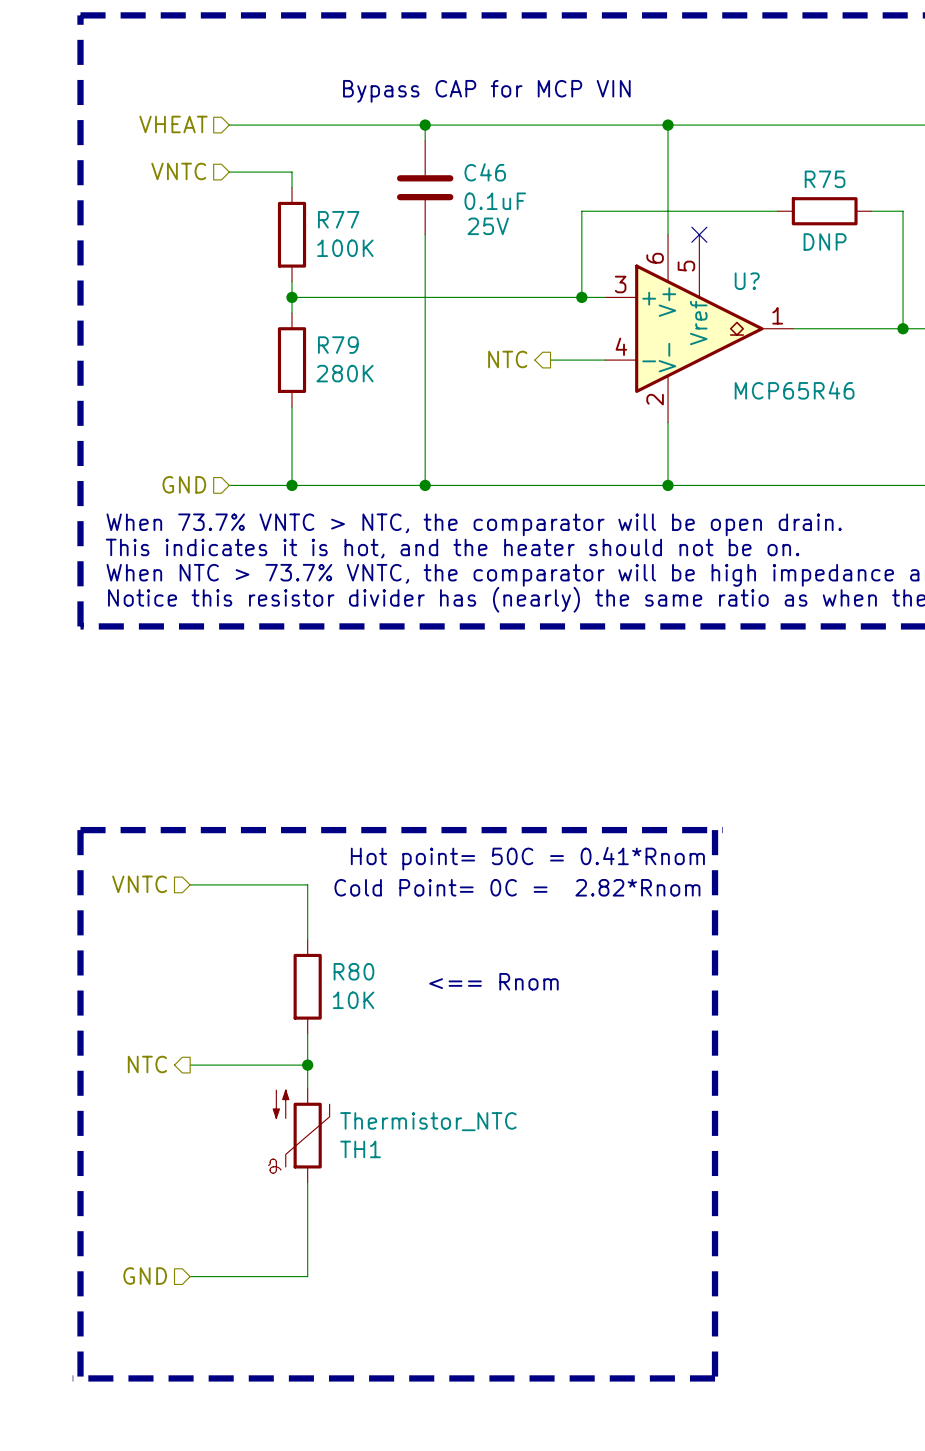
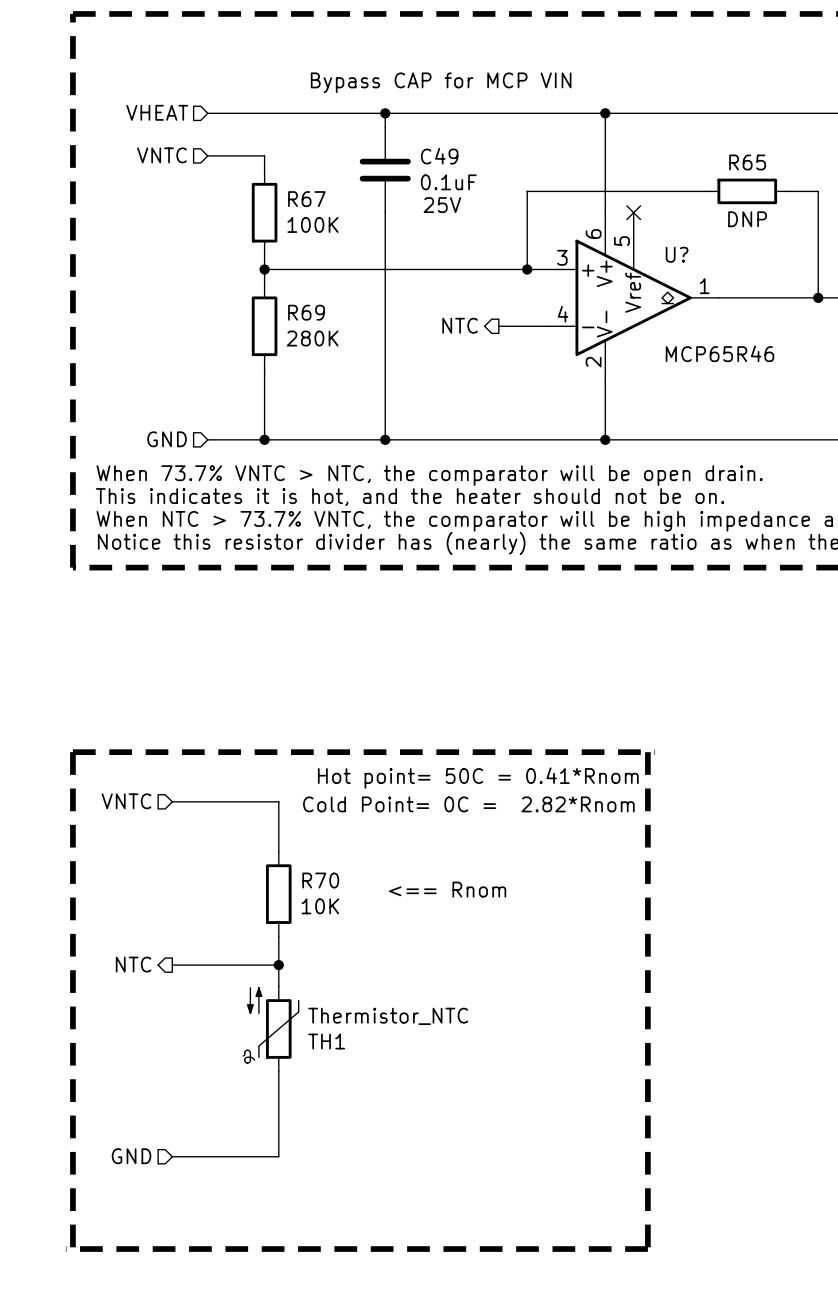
C46 name: C46 (485, 172) -> C49 (439, 156)
R75 name: R75 (825, 179) -> R65 (747, 162)
R77 name: R77 (338, 219) -> R67 (306, 199)
R79 name: R79 (338, 345) -> R69 (306, 312)
R80 name: R80 (353, 971) -> R70 (320, 880)

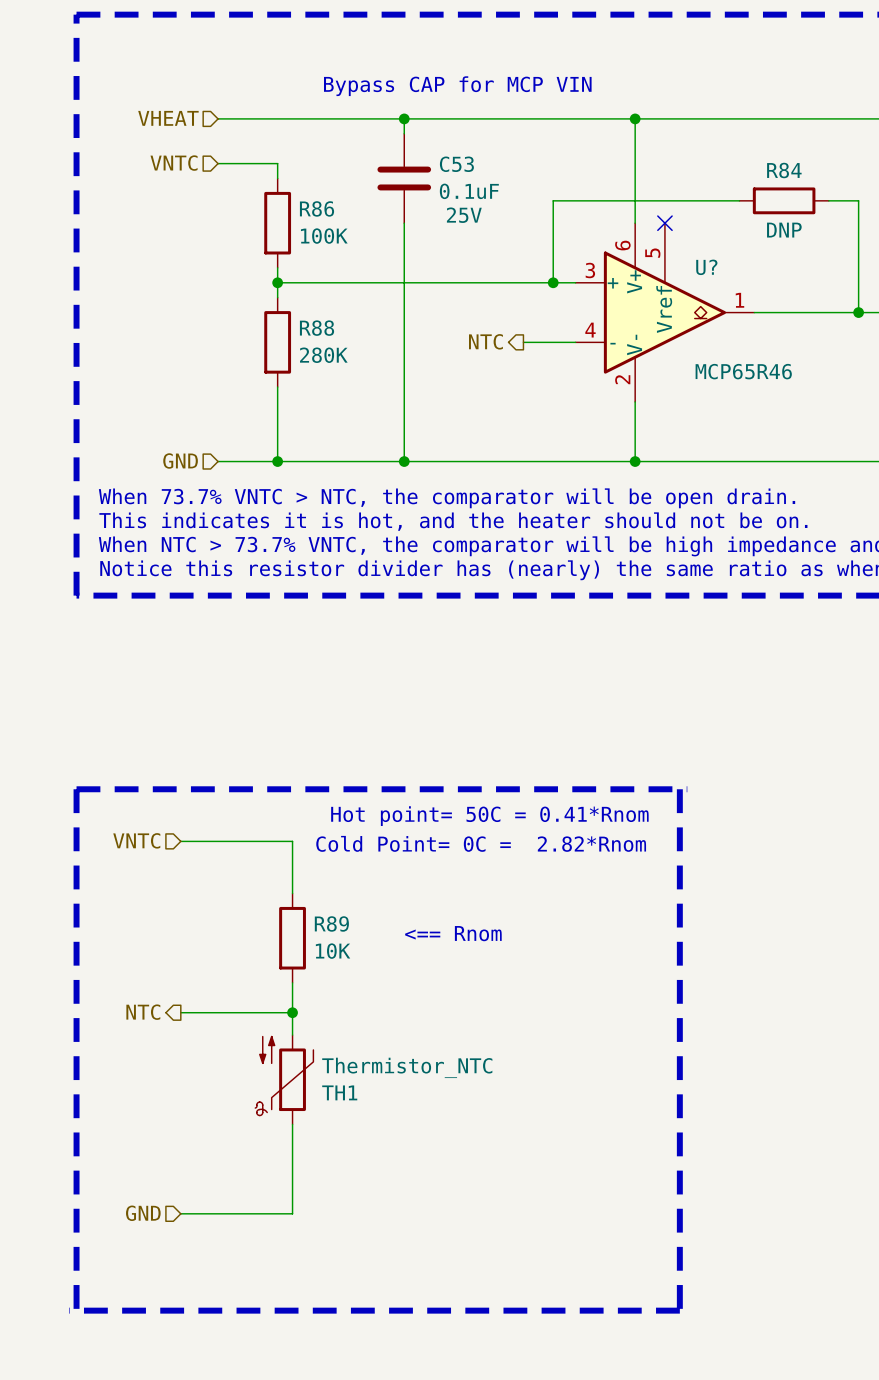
C49 name: C49 (439, 156) -> C53 (456, 164)
R65 name: R65 (747, 162) -> R84 (784, 170)
R67 name: R67 (306, 199) -> R86 (317, 208)
R69 name: R69 (306, 312) -> R88 (317, 328)
R70 name: R70 (320, 880) -> R89 (331, 923)

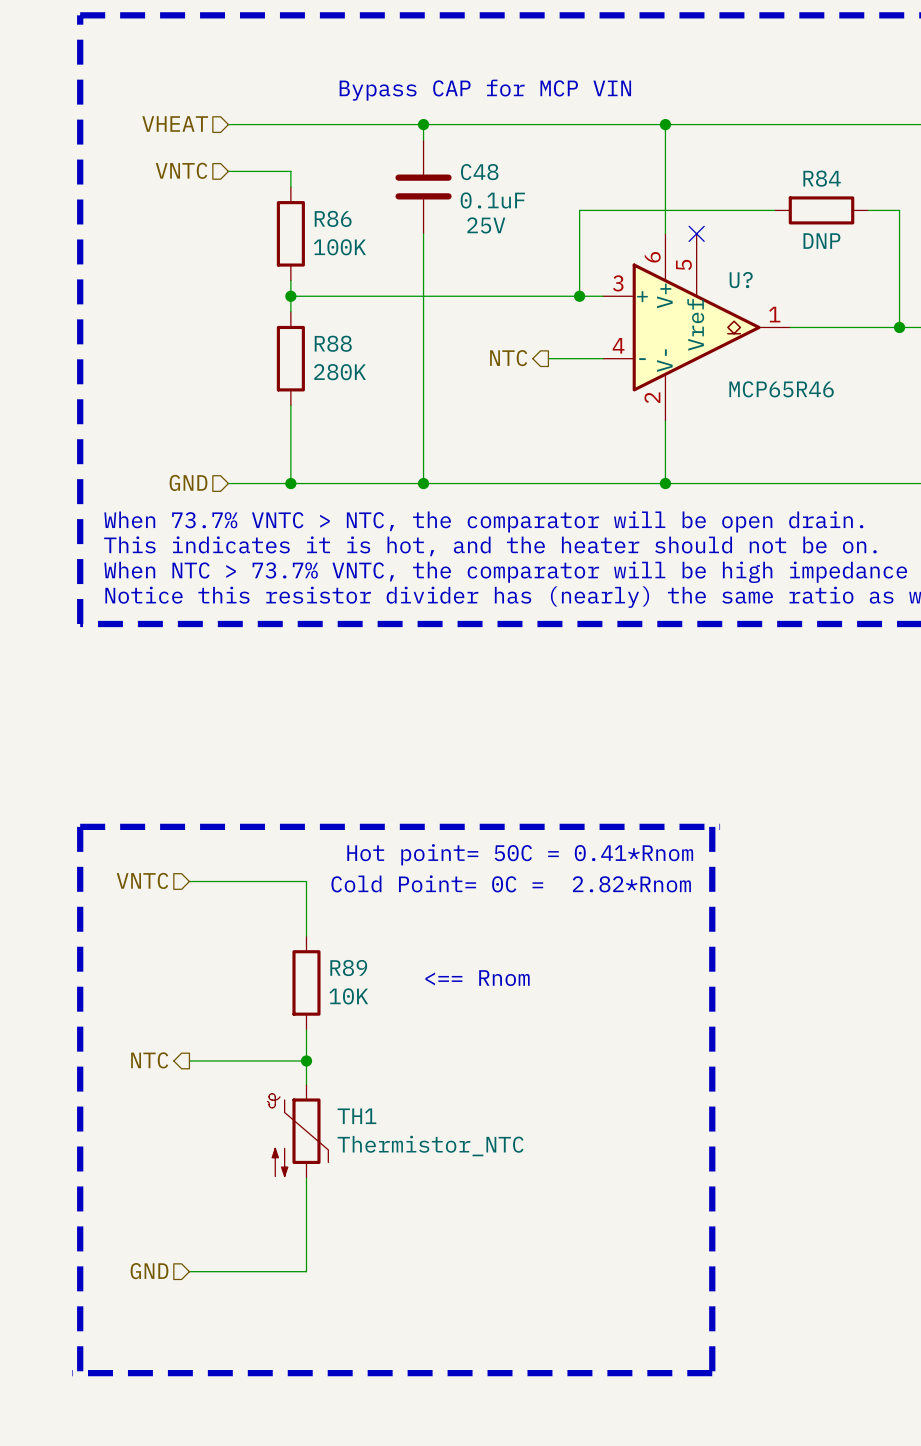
C53 name: C53 (456, 164) -> C48 (479, 172)
TH1 flip: as is (284, 1076) -> up-down (297, 1135)

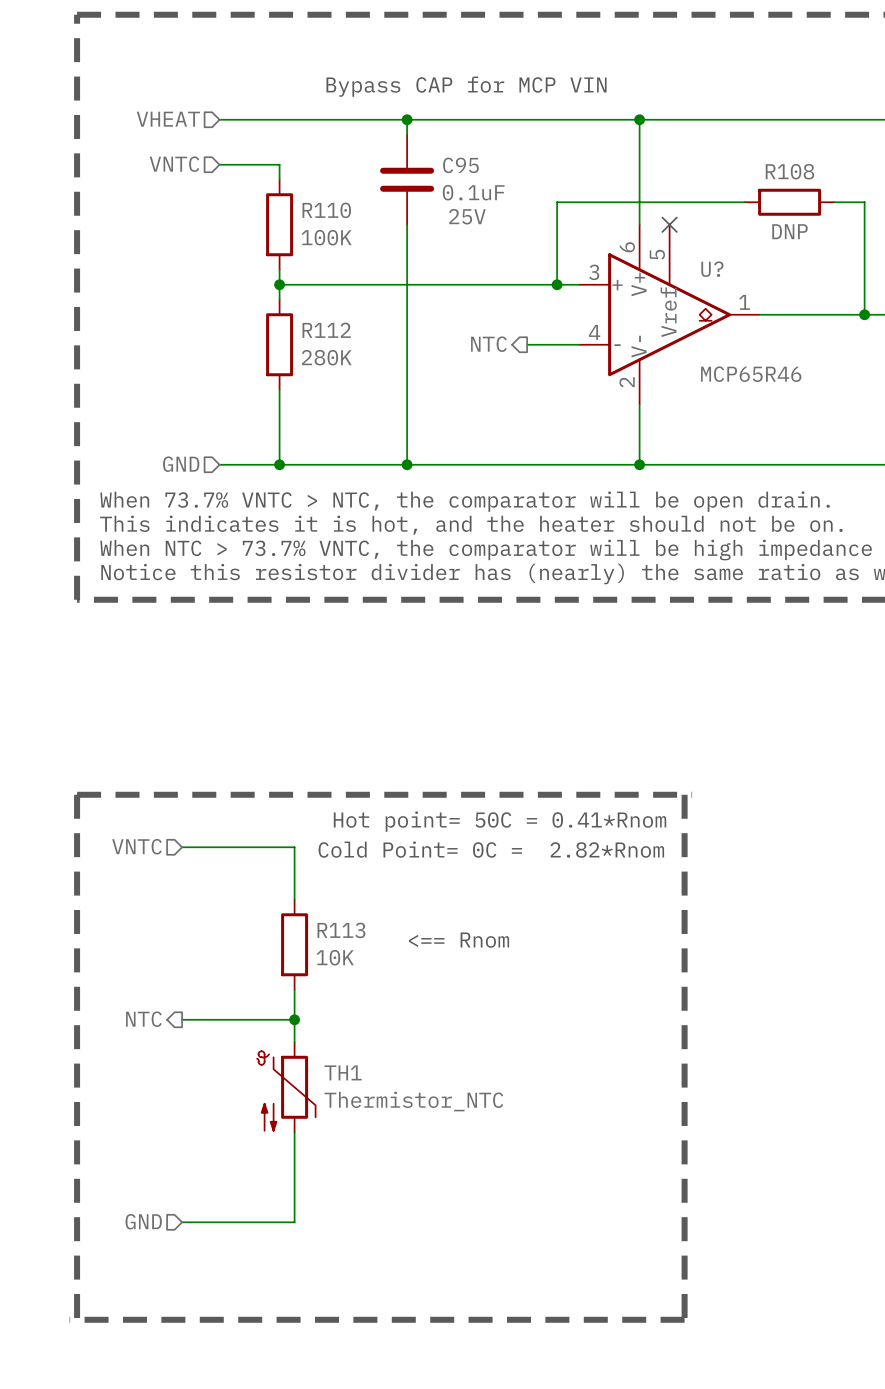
C48 name: C48 (479, 172) -> C95 (460, 165)
R84 name: R84 (822, 178) -> R108 (789, 171)
R86 name: R86 (333, 218) -> R110 (326, 210)
R88 name: R88 (333, 343) -> R112 (326, 330)
R89 name: R89 (348, 968) -> R113 (341, 930)

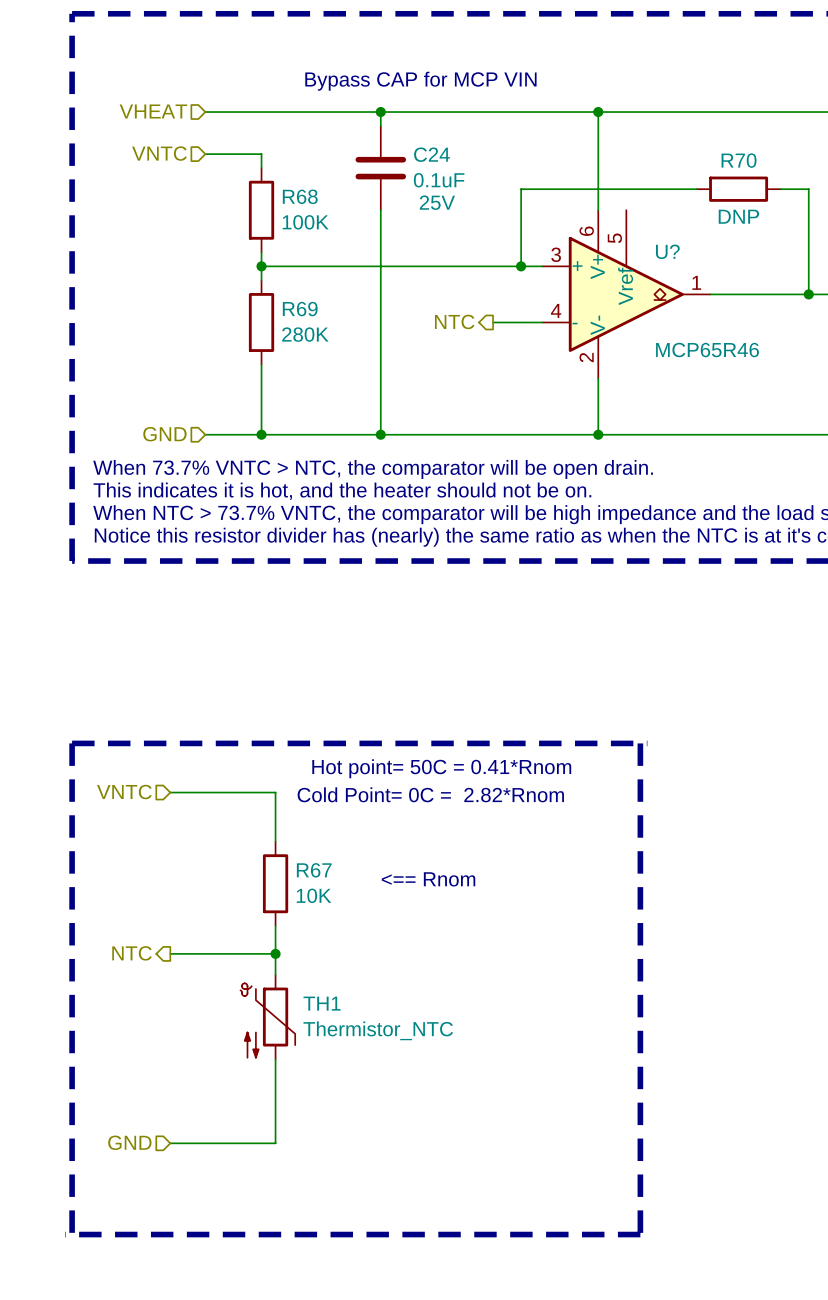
C95 name: C95 (460, 165) -> C24 (431, 154)
R108 name: R108 (789, 171) -> R70 (739, 160)
R110 name: R110 (326, 210) -> R68 (300, 196)
no-connect mark: (669, 224) -> none
R112 name: R112 (326, 330) -> R69 (300, 309)
R113 name: R113 (341, 930) -> R67 (314, 870)

